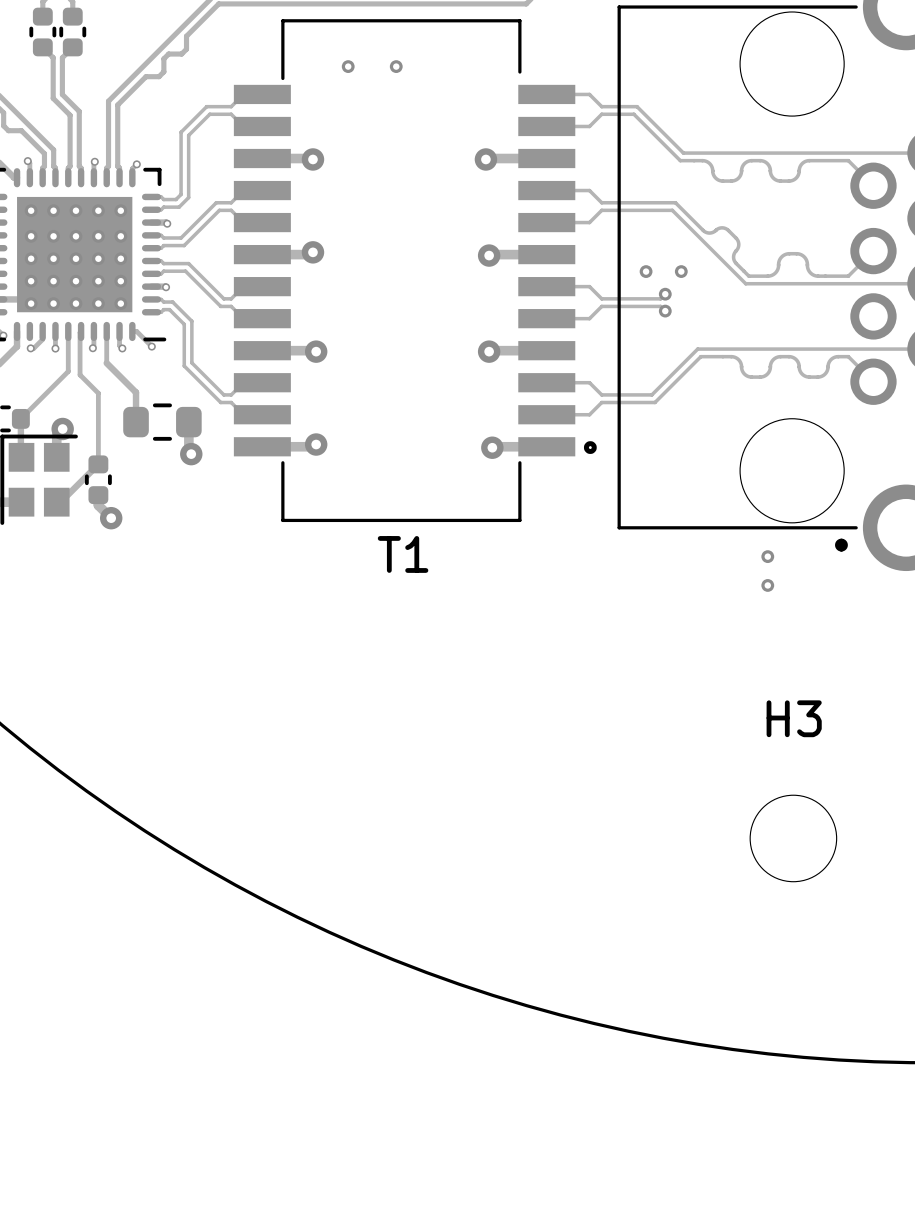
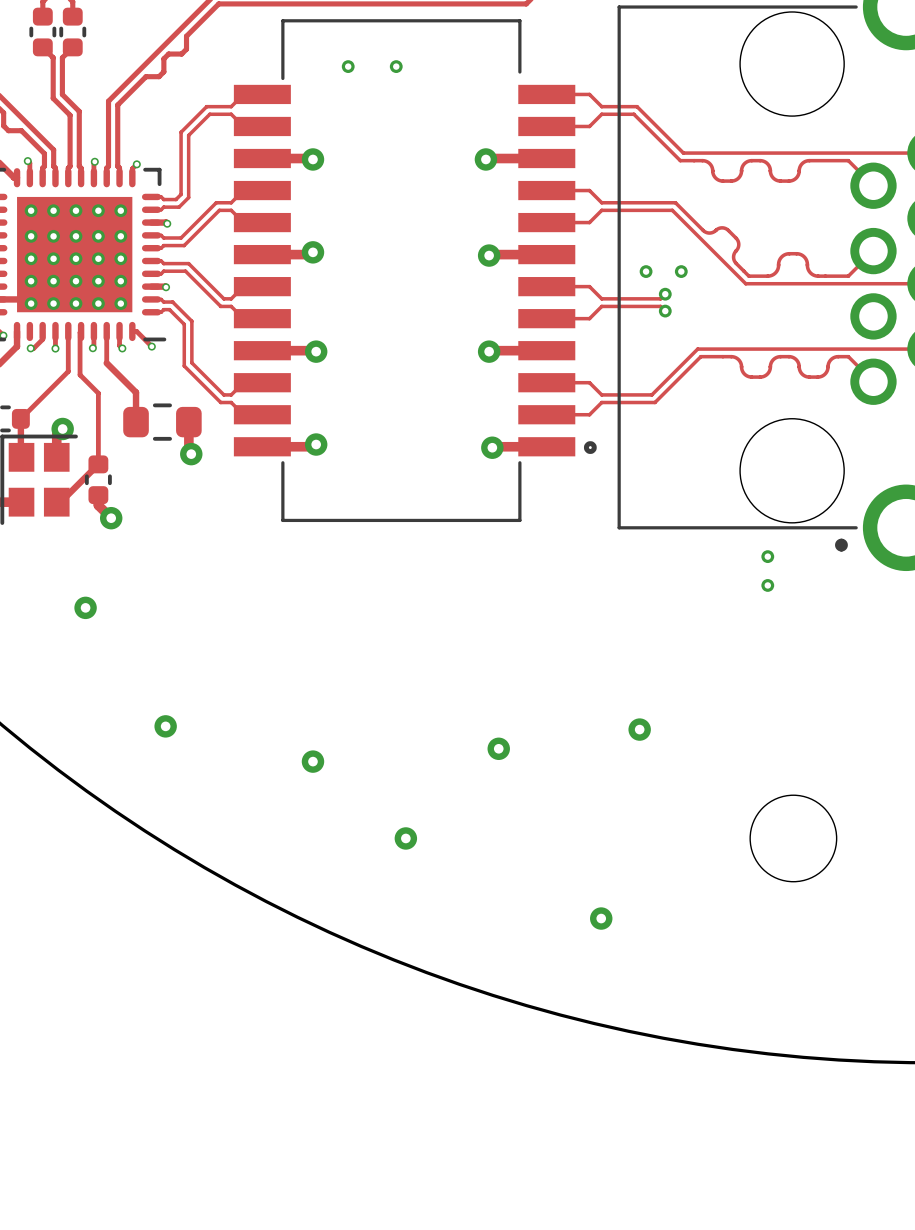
T1 name: T1 (403, 554) -> none
via: none -> (85, 607)
H3 name: H3 (794, 718) -> none
via: none -> (165, 726)
via: none -> (639, 729)
via: none -> (498, 748)
via: none -> (312, 761)
via: none -> (405, 838)
via: none -> (601, 918)

